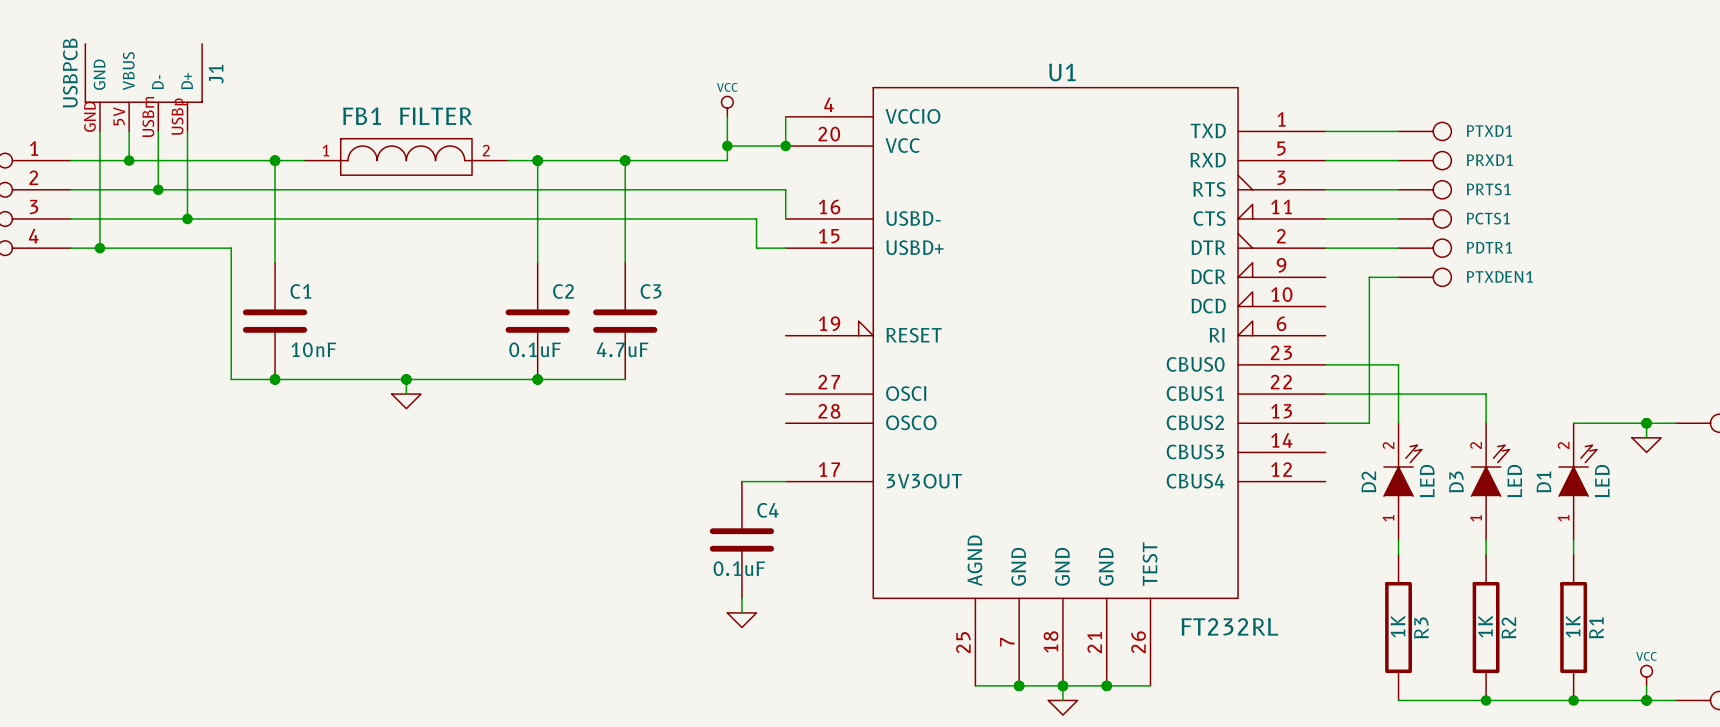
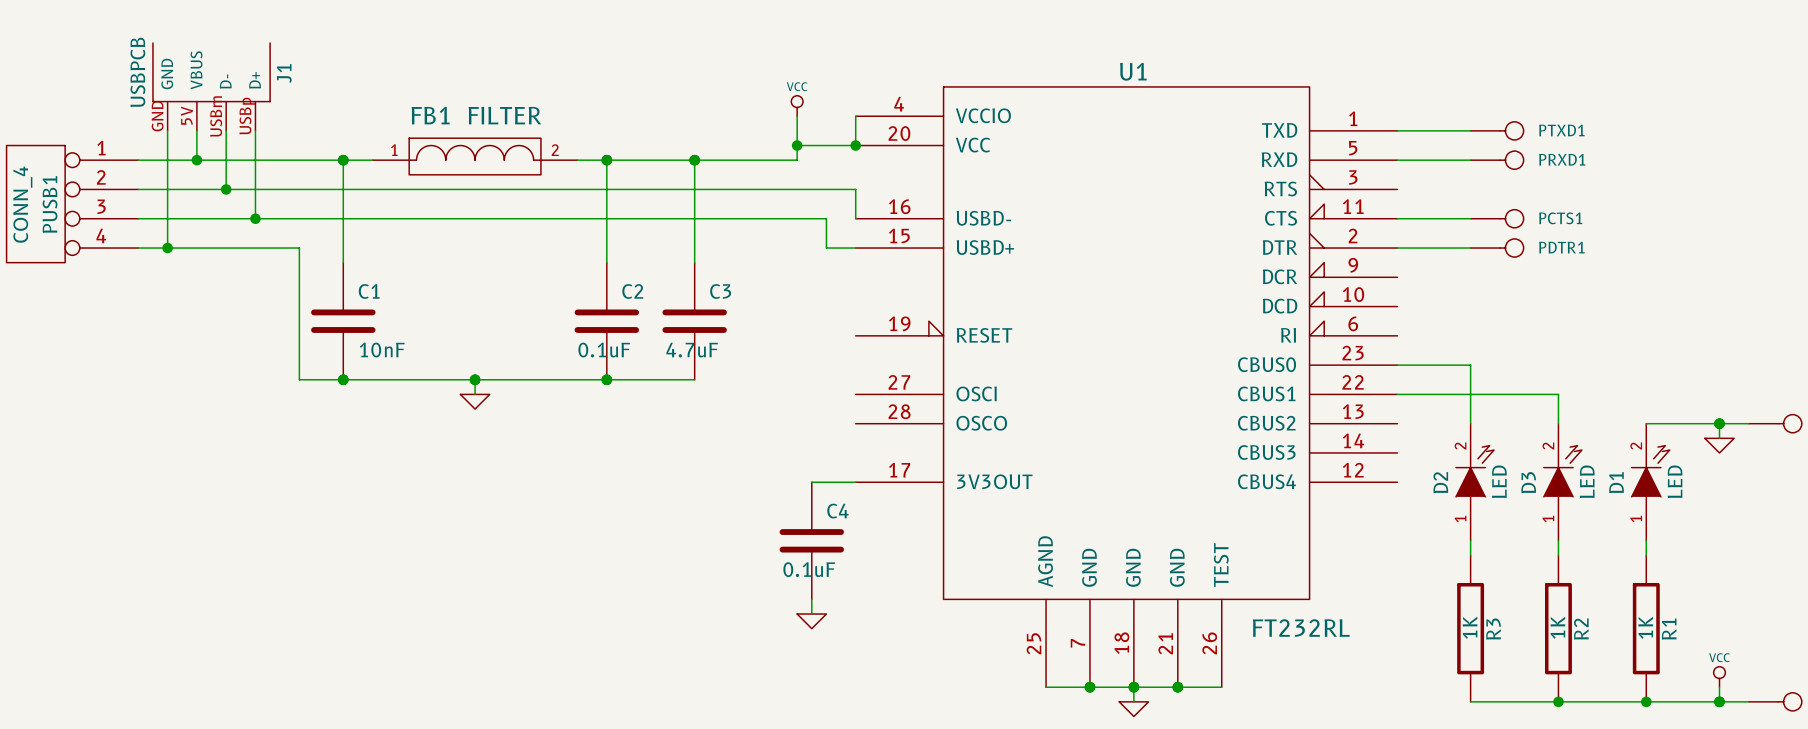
wire: (1325, 189) (1398, 189) -> none
PRTS1: (1424, 189) -> none
wire: (1398, 277) (1369, 277) (1369, 423) (1325, 423) -> none
PTXDEN1: (1424, 277) -> none

